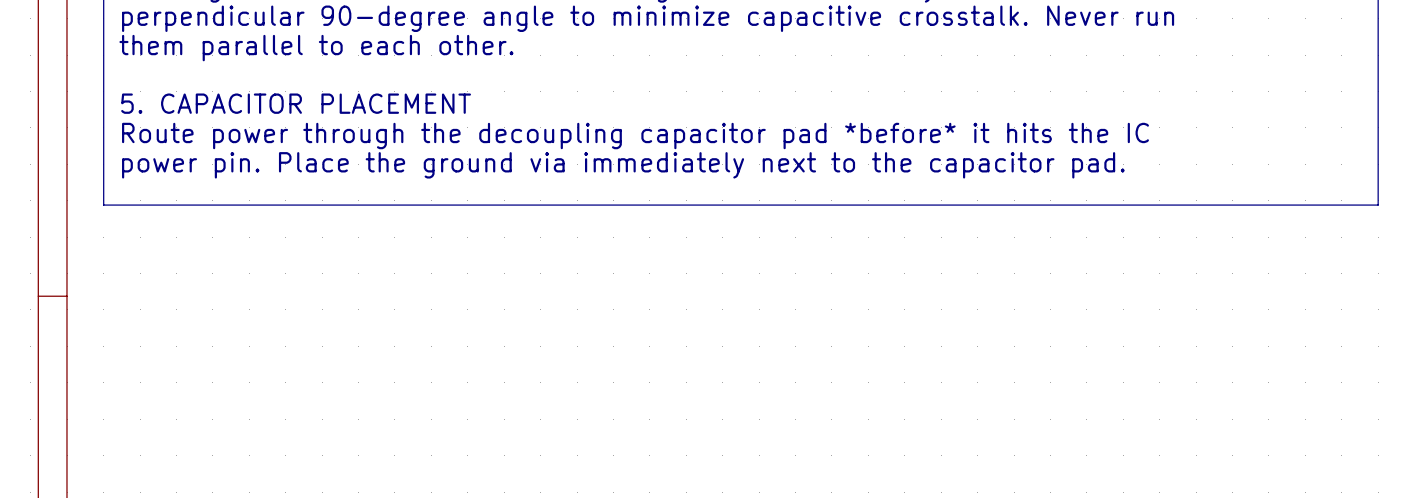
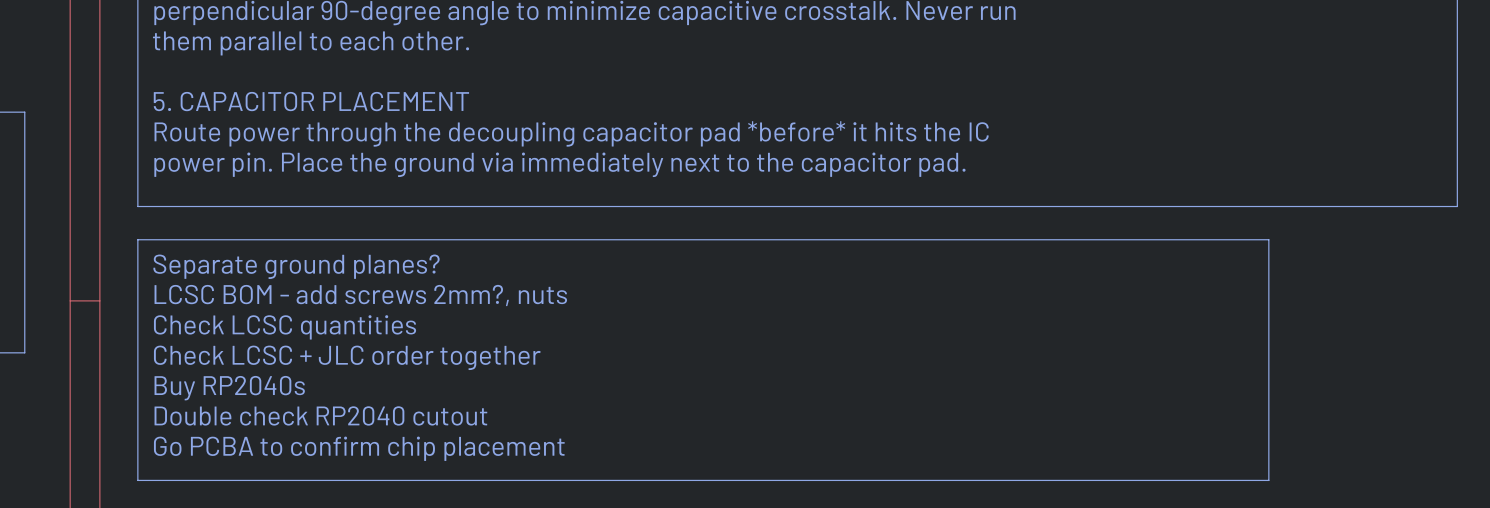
line: none -> (137, 239) (1268, 239) (1268, 480) (137, 480) (137, 239)
text: none -> Separate ground planes? (296, 266)
text: none -> LCSC BOM - add screws 2mm?, nuts (360, 295)
text: none -> Check LCSC quantities (285, 327)
text: none -> Check LCSC + JLC order together (347, 357)
text: none -> Buy RP2040s (229, 388)
text: none -> Double check RP2040 cutout (320, 415)
text: none -> Go PCBA to confirm chip placement (359, 448)

